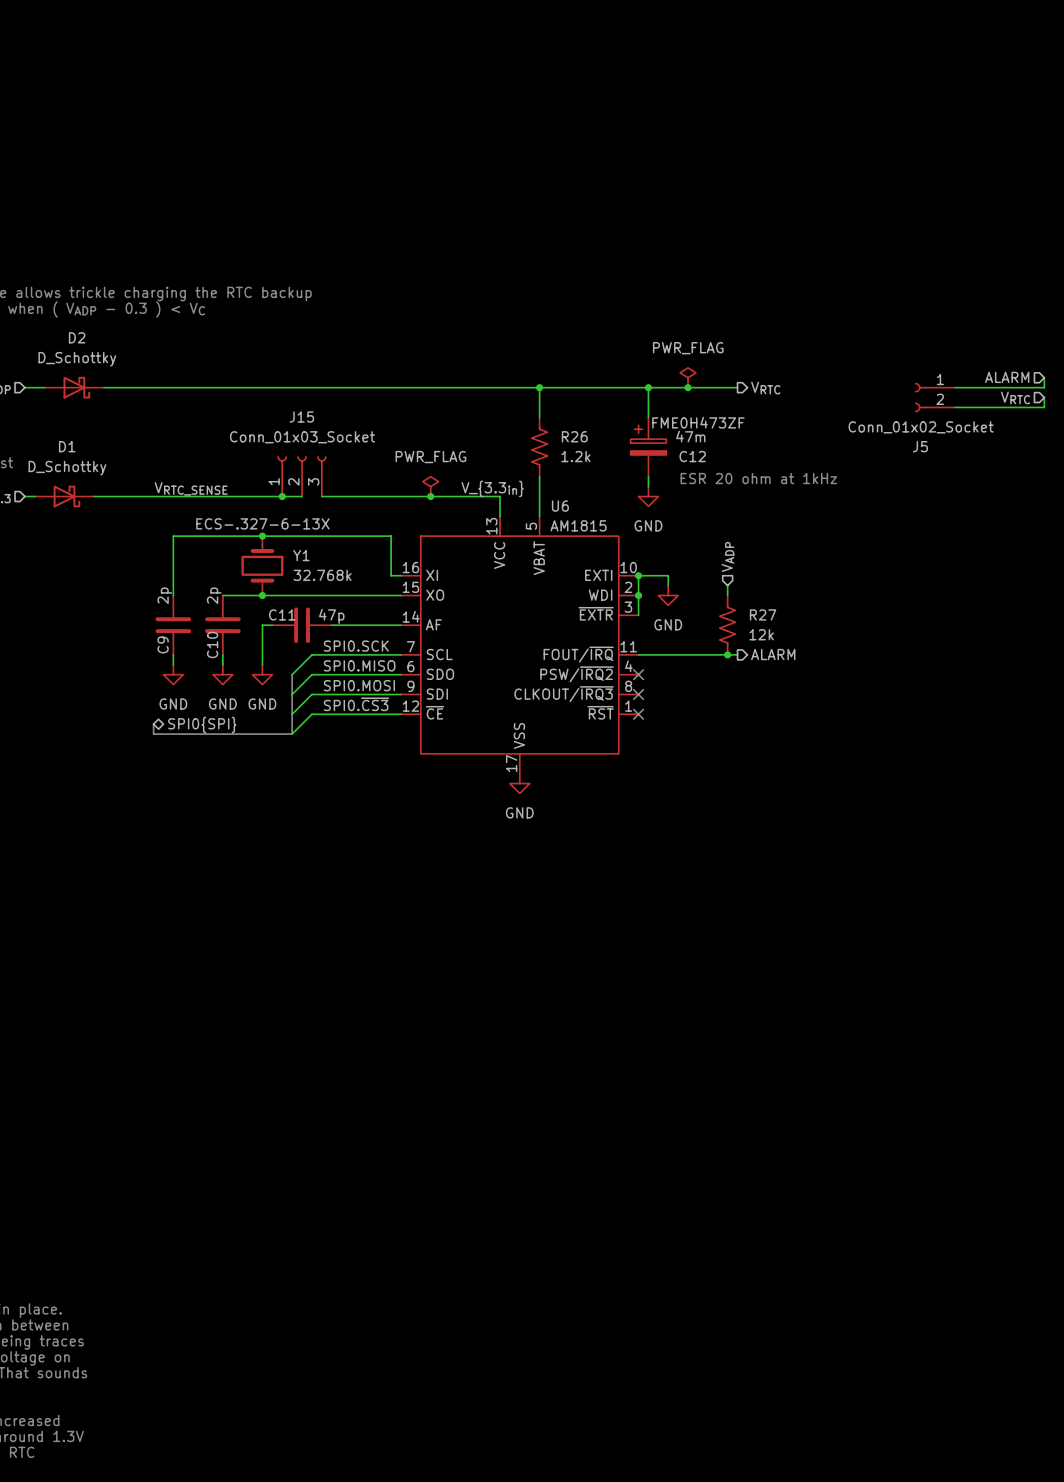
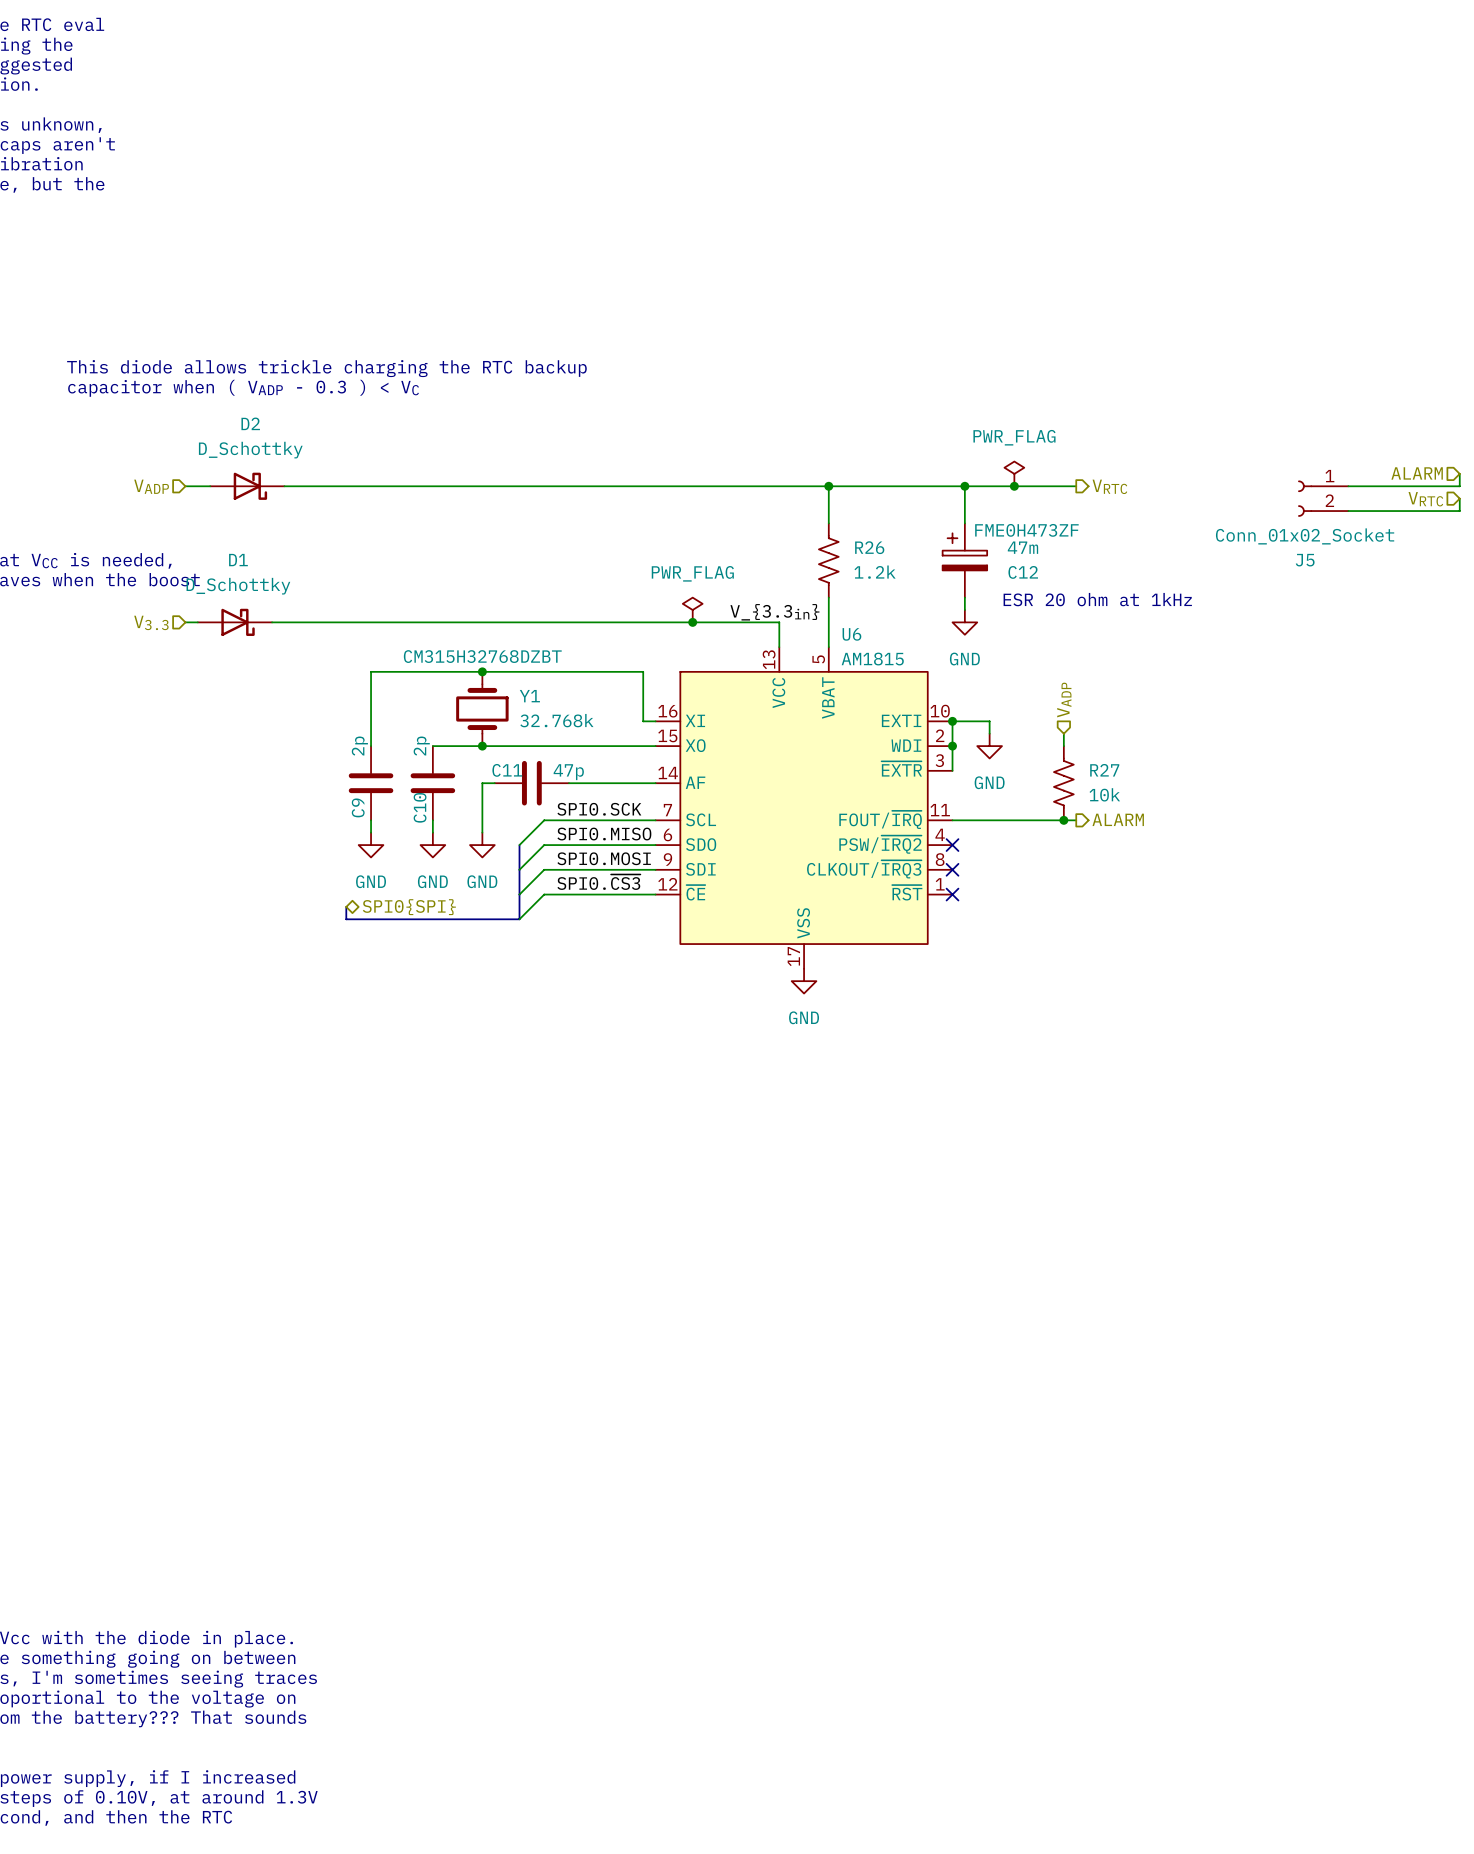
J15: Conn_01x03_Socket (302, 476) -> none
label: VRTC_SENSE (191, 488) -> none
junction: (282, 496) -> none
wire: none -> (531, 622) (556, 622)
Y1 text: ECS-.327-6-13X (262, 523) -> CM315H32768DZBT (482, 656)
R27 value: 12k (761, 634) -> 10k (1104, 794)

